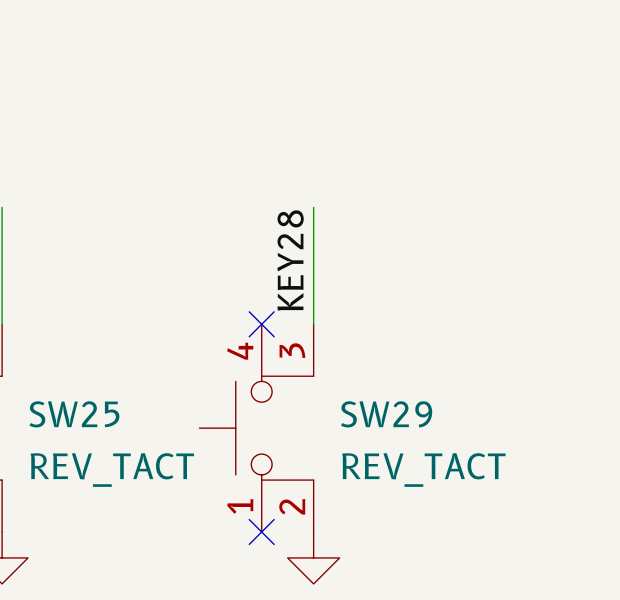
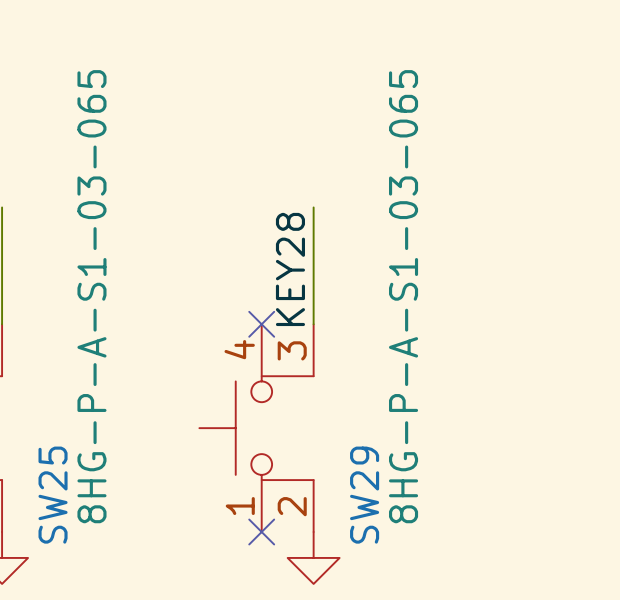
SW25 name rotation: 0° (74, 414) -> 90° counterclockwise (53, 495)
SW29 name rotation: 0° (386, 414) -> 90° counterclockwise (364, 495)
SW25 value: REV_TACT (112, 470) -> 8HG-P-A-S1-03-065 (91, 296)
SW29 value: REV_TACT (423, 470) -> 8HG-P-A-S1-03-065 (403, 296)

